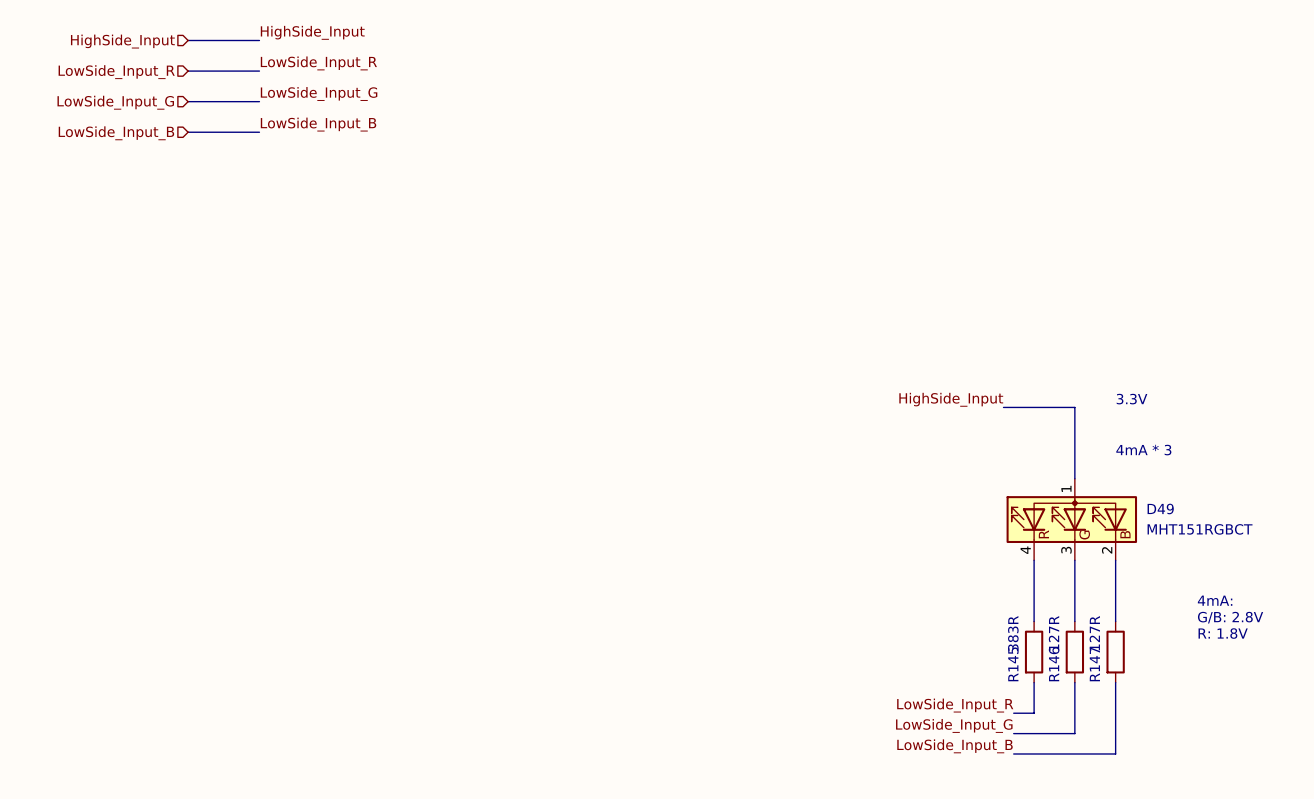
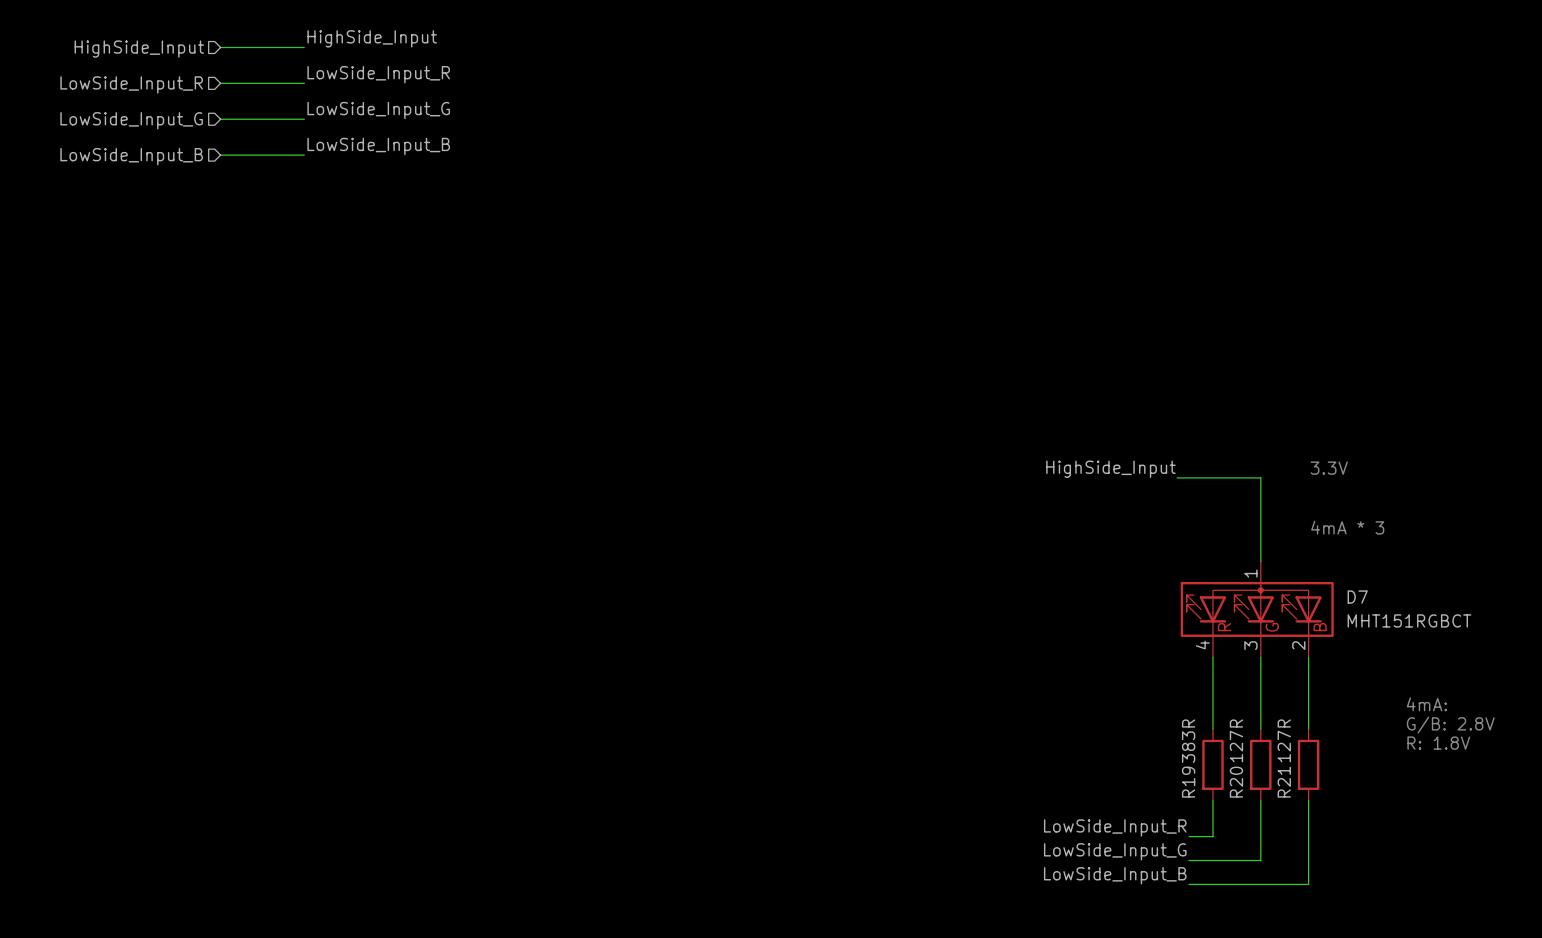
D49 name: D49 (1160, 508) -> D7 (1357, 597)
R145 name: R145 (1013, 664) -> R19 (1188, 782)
R146 name: R146 (1054, 664) -> R20 (1236, 782)
R147 name: R147 (1094, 664) -> R21 (1284, 782)

